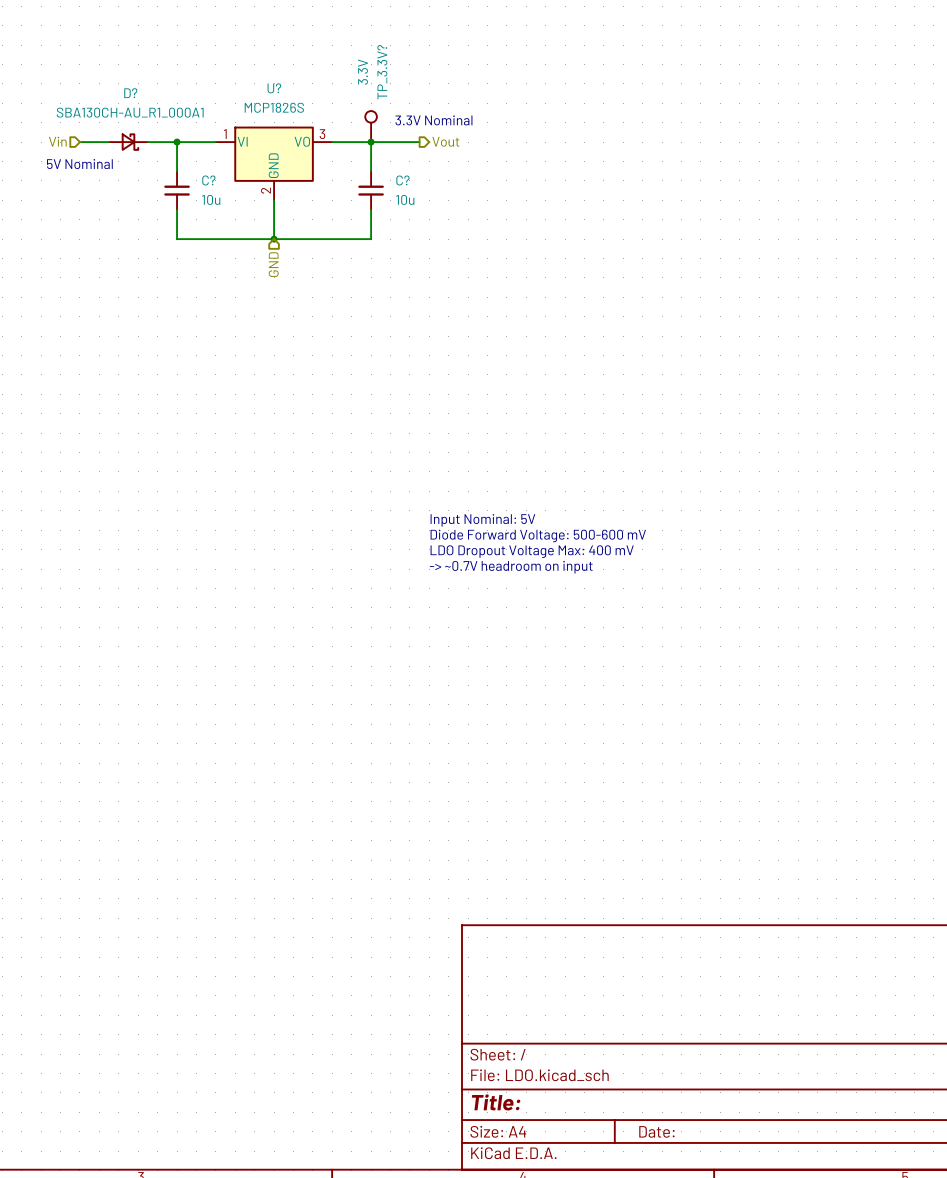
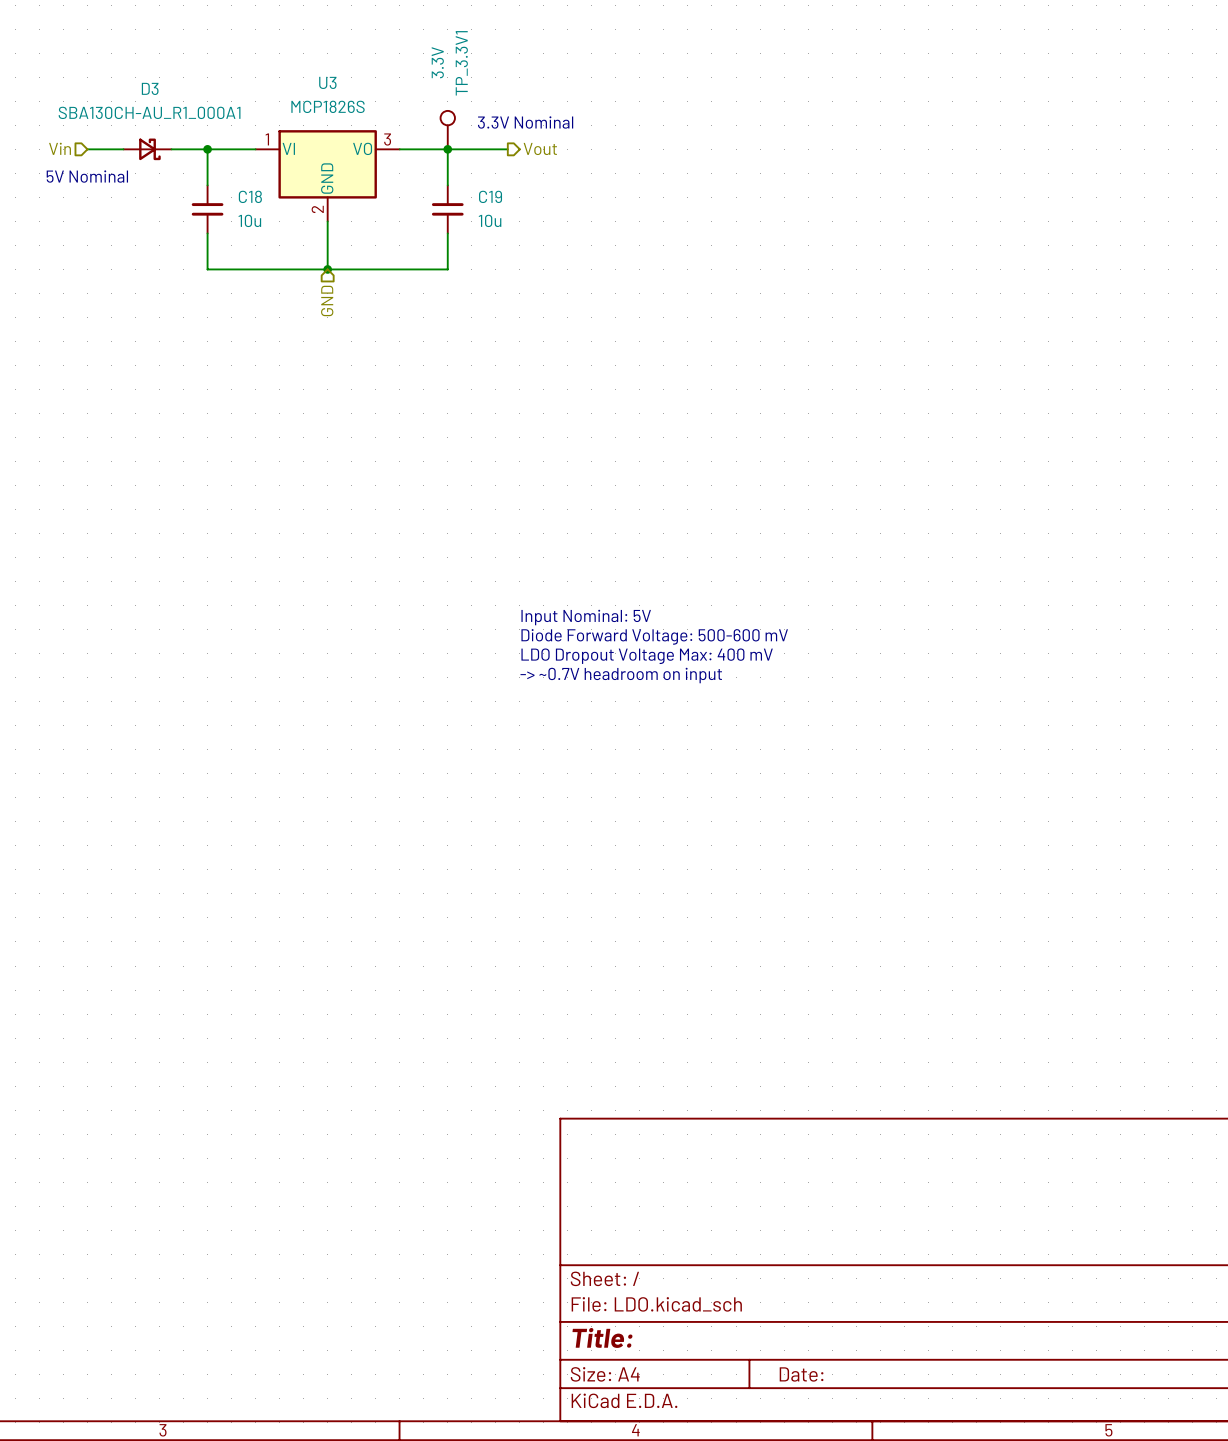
TP_3.3V? name: TP_3.3V? (382, 72) -> TP_3.3V1 (461, 63)
U? name: U? (274, 88) -> U3 (327, 82)
D? name: D? (130, 93) -> D3 (150, 88)
C? name: C? (208, 180) -> C18 (250, 196)
C? name: C? (402, 180) -> C19 (490, 196)

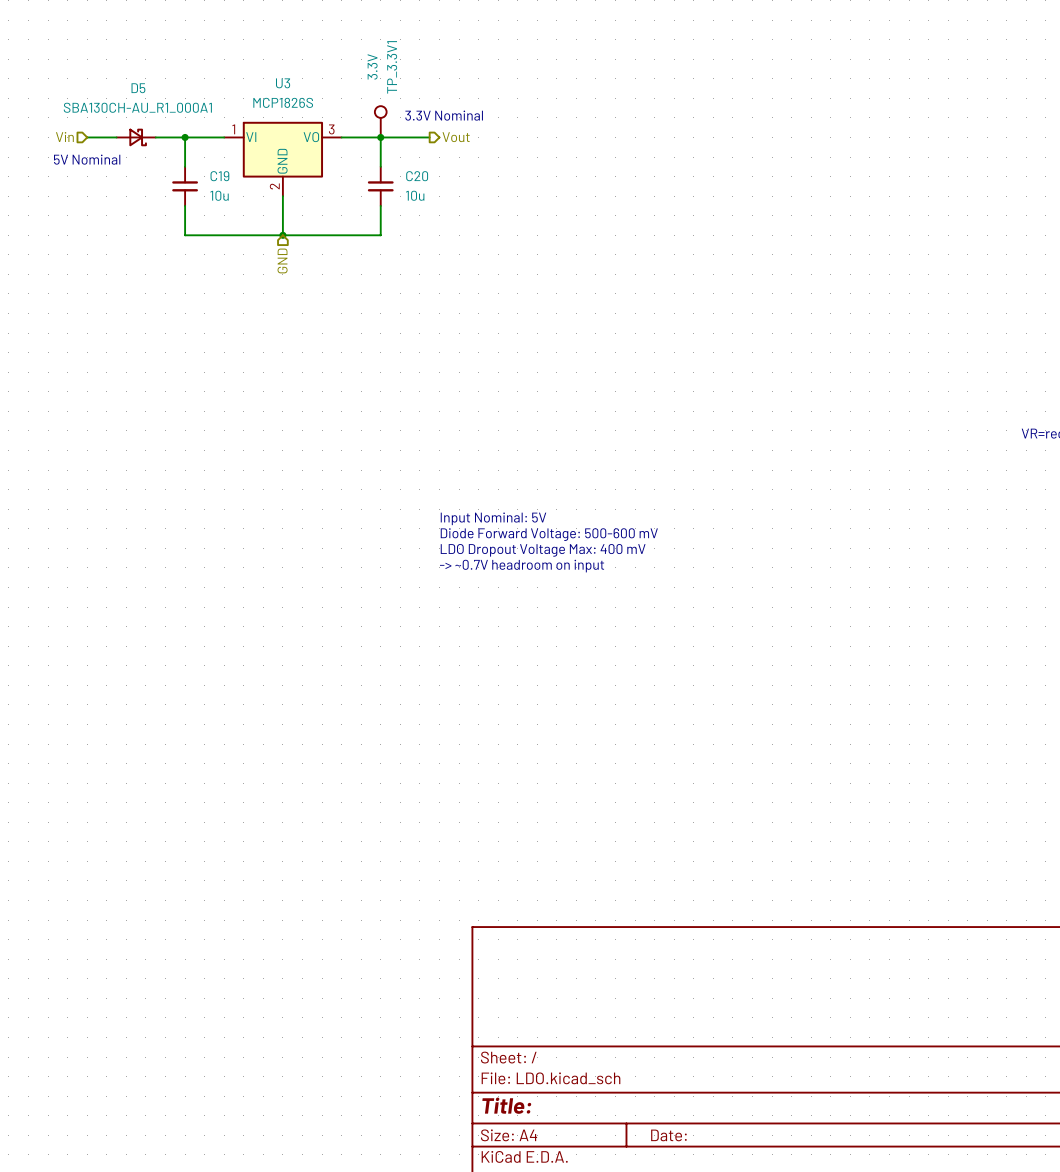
D3 name: D3 (150, 88) -> D5 (138, 88)
C18 name: C18 (250, 196) -> C19 (219, 176)
C19 name: C19 (490, 196) -> C20 (417, 176)

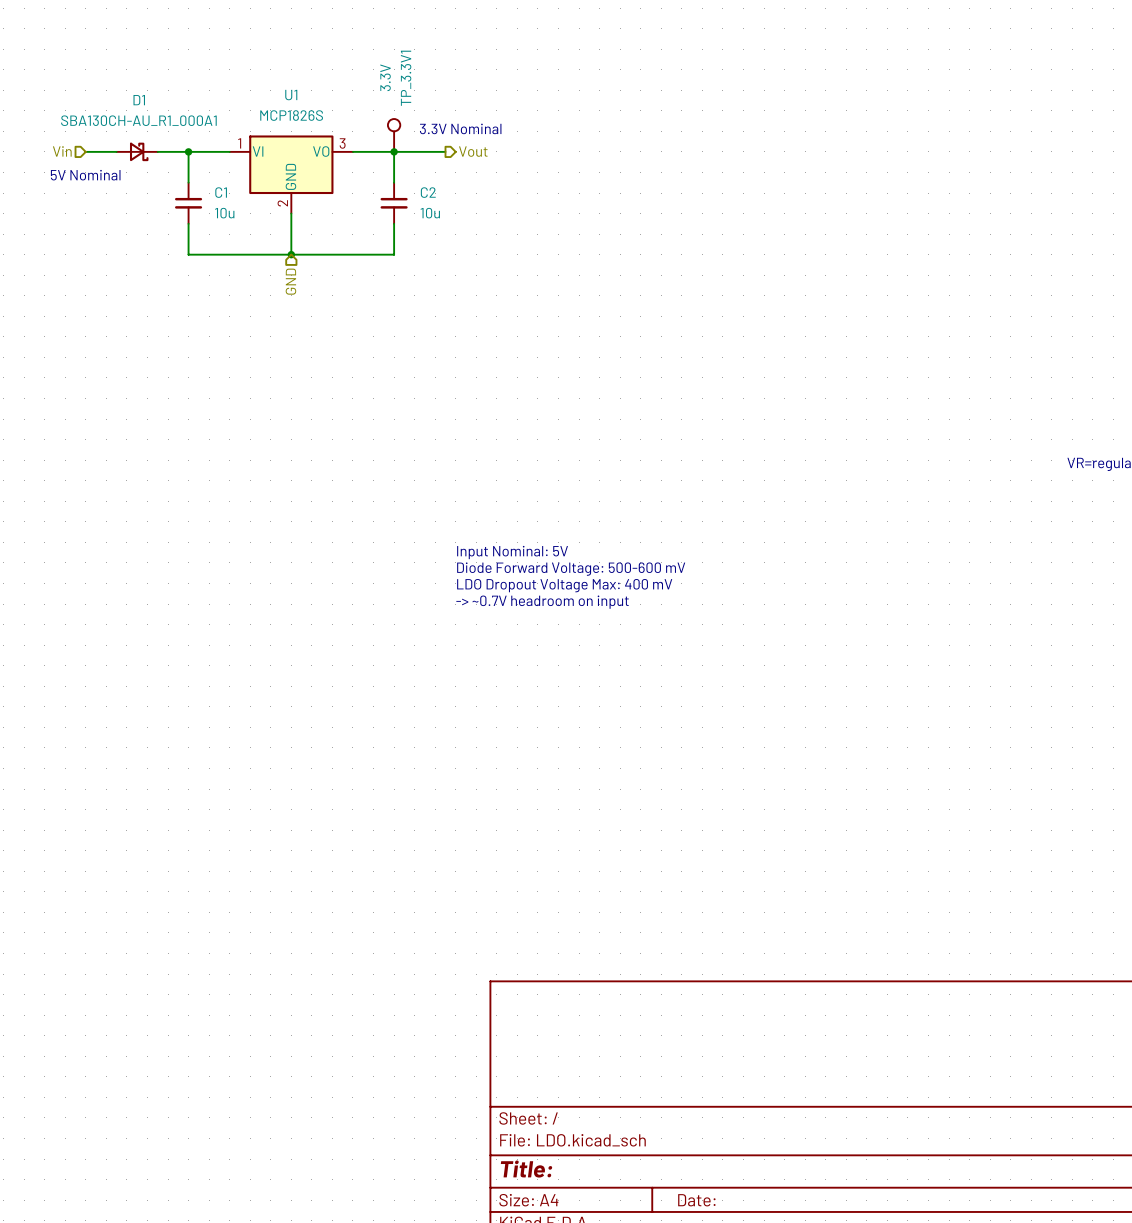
U3 name: U3 (283, 83) -> U1 (291, 95)
D5 name: D5 (138, 88) -> D1 (139, 100)
C19 name: C19 (219, 176) -> C1 (221, 192)
C20 name: C20 (417, 176) -> C2 (428, 192)

